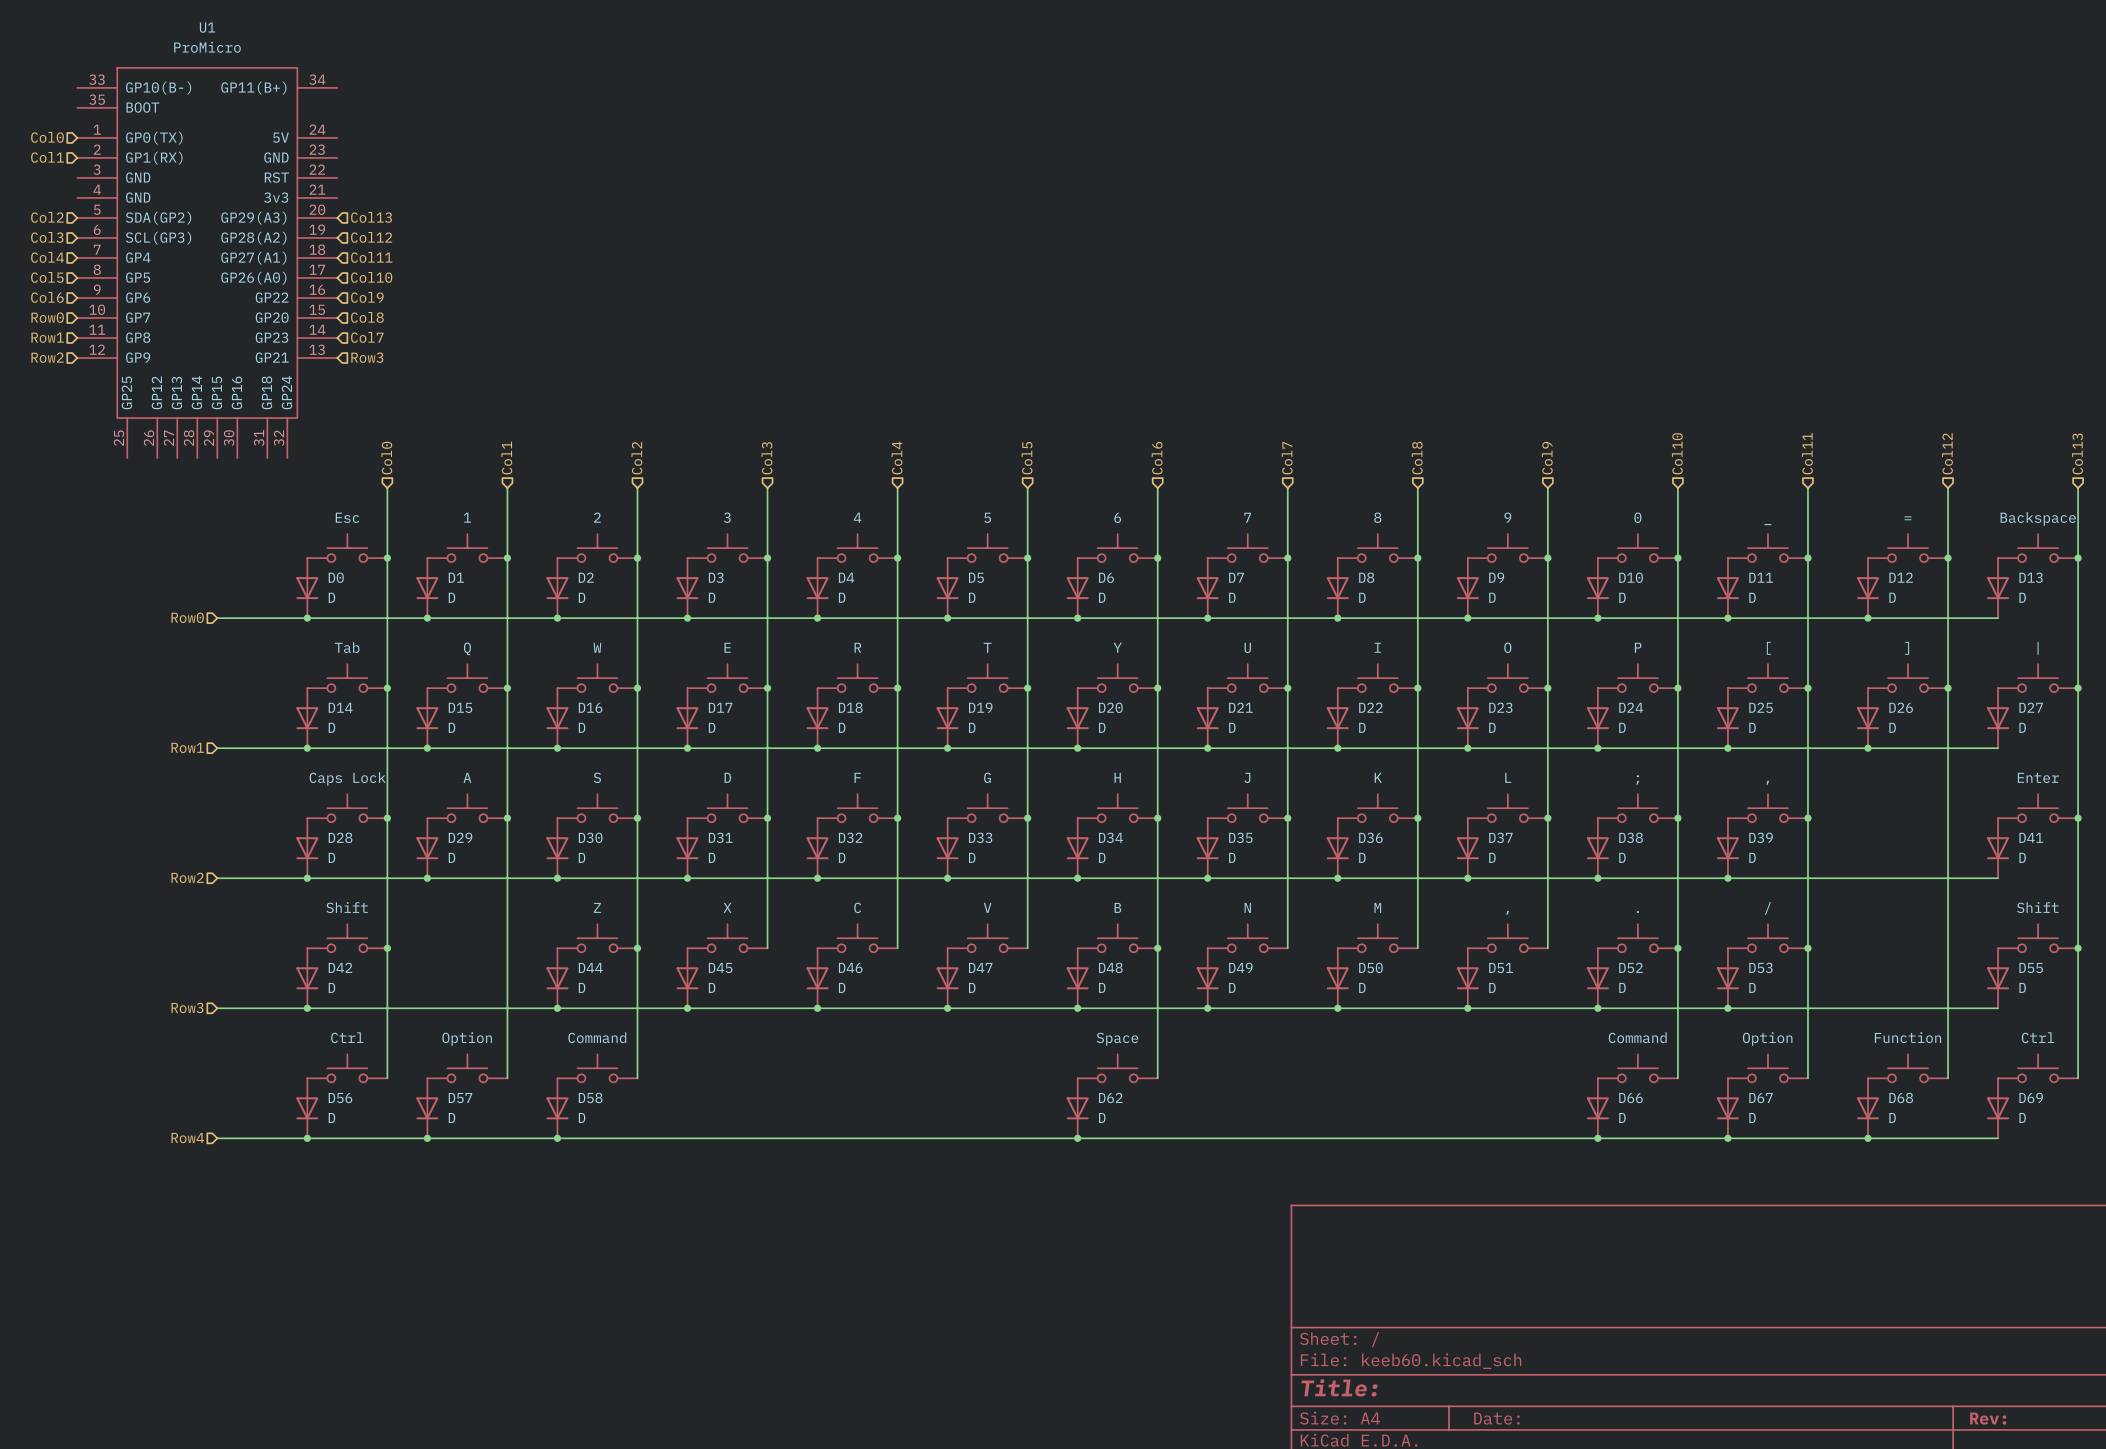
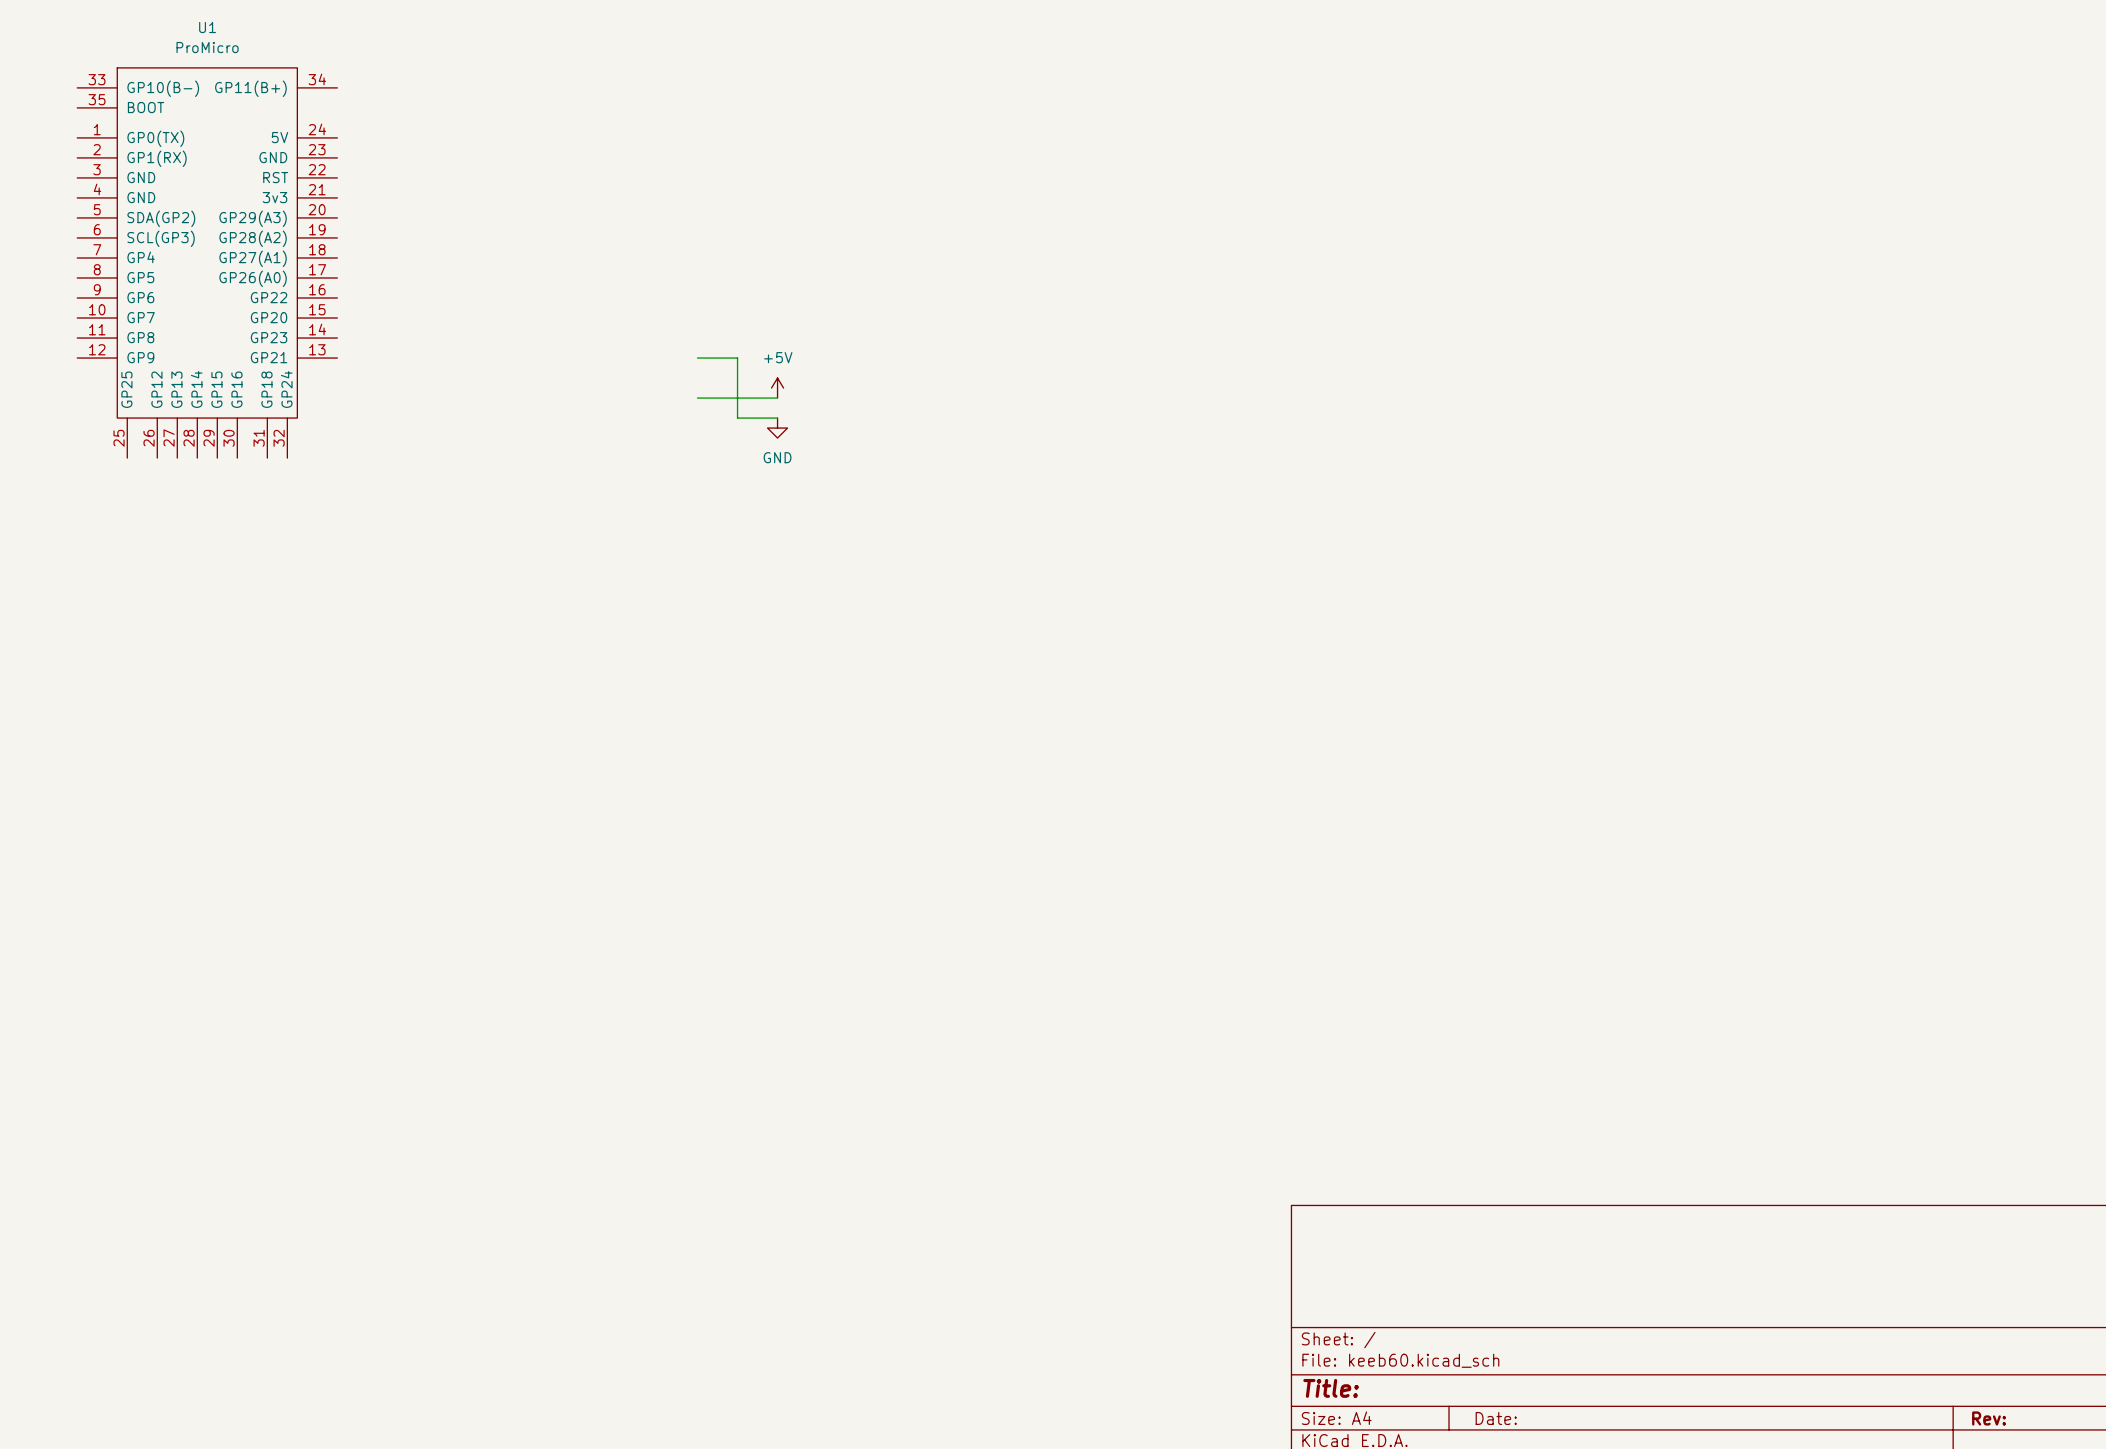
hierarchical label: Col0 (47, 137) -> none
hierarchical label: Col1 (47, 157) -> none
hierarchical label: Col2 (47, 217) -> none
hierarchical label: Col13 (371, 217) -> none
hierarchical label: Col3 (47, 237) -> none
hierarchical label: Col12 (371, 237) -> none
hierarchical label: Col4 (47, 257) -> none
hierarchical label: Col11 (371, 257) -> none
hierarchical label: Col5 (47, 277) -> none
hierarchical label: Col10 (371, 277) -> none
hierarchical label: Col6 (47, 297) -> none
hierarchical label: Col9 (367, 297) -> none
hierarchical label: Row0 (47, 317) -> none
hierarchical label: Col8 (367, 317) -> none
hierarchical label: Row1 (47, 337) -> none
hierarchical label: Col7 (367, 337) -> none
hierarchical label: Row2 (47, 357) -> none
hierarchical label: Row3 (367, 357) -> none
wire: none -> (697, 358) (737, 358) (737, 418) (777, 418)
power symbol: none -> +5V (777, 388)
wire: none -> (697, 398) (777, 398)
power symbol: none -> GND (777, 428)
hierarchical label: Col10 (1677, 453) -> none
hierarchical label: Col11 (1807, 453) -> none
hierarchical label: Col12 (1947, 453) -> none
hierarchical label: Col13 (2077, 453) -> none
hierarchical label: Col4 (897, 457) -> none
hierarchical label: Col0 (386, 458) -> none
hierarchical label: Col1 (506, 458) -> none
hierarchical label: Col2 (636, 458) -> none
hierarchical label: Col3 (766, 458) -> none
hierarchical label: Col5 (1027, 458) -> none
hierarchical label: Col6 (1157, 458) -> none
hierarchical label: Col7 (1287, 458) -> none
hierarchical label: Col8 (1417, 458) -> none
hierarchical label: Col9 (1547, 458) -> none
wire: (387, 488) (387, 1078) -> none
wire: (507, 488) (507, 1078) -> none
wire: (637, 488) (637, 1078) -> none
wire: (767, 488) (767, 948) -> none
wire: (897, 488) (897, 948) -> none
wire: (1027, 488) (1027, 948) -> none
wire: (1157, 488) (1157, 1078) -> none
wire: (1287, 488) (1287, 948) -> none
wire: (1417, 488) (1417, 948) -> none
wire: (1547, 488) (1547, 948) -> none
wire: (1677, 488) (1677, 1078) -> none
wire: (1807, 488) (1807, 1078) -> none
wire: (1948, 488) (1948, 1078) -> none
wire: (2078, 488) (2078, 1078) -> none
part: Esc (347, 548) -> none
part: 1 (467, 548) -> none
part: 2 (597, 548) -> none
part: 3 (727, 548) -> none
part: 4 (857, 548) -> none
part: 5 (987, 548) -> none
part: 6 (1117, 548) -> none
part: 7 (1247, 548) -> none
part: 8 (1377, 548) -> none
part: 9 (1507, 548) -> none
part: 0 (1637, 548) -> none
part: _ (1767, 548) -> none
part: = (1908, 548) -> none
part: Backspace (2038, 548) -> none
junction: (387, 558) -> none
junction: (507, 558) -> none
junction: (637, 558) -> none
junction: (767, 558) -> none
junction: (897, 558) -> none
junction: (1027, 558) -> none
junction: (1157, 558) -> none
junction: (1287, 558) -> none
junction: (1417, 558) -> none
junction: (1547, 558) -> none
junction: (1677, 558) -> none
junction: (1807, 558) -> none
junction: (1948, 558) -> none
junction: (2078, 558) -> none
D0: D (307, 588) -> none
D1: D (427, 588) -> none
D2: D (557, 588) -> none
D3: D (687, 588) -> none
D4: D (817, 588) -> none
D5: D (947, 588) -> none
D6: D (1077, 588) -> none
D7: D (1207, 588) -> none
D8: D (1337, 588) -> none
D9: D (1467, 588) -> none
D10: D (1597, 588) -> none
D11: D (1727, 588) -> none
D12: D (1867, 588) -> none
D13: D (1998, 588) -> none
hierarchical label: Row0 (187, 617) -> none
wire: (217, 618) (1998, 618) -> none
junction: (307, 618) -> none
junction: (427, 618) -> none
junction: (557, 618) -> none
junction: (687, 618) -> none
junction: (817, 618) -> none
junction: (947, 618) -> none
junction: (1077, 618) -> none
junction: (1207, 618) -> none
junction: (1337, 618) -> none
junction: (1467, 618) -> none
junction: (1597, 618) -> none
junction: (1727, 618) -> none
junction: (1867, 618) -> none
part: Tab (347, 678) -> none
part: Q (467, 678) -> none
part: W (597, 678) -> none
part: E (727, 678) -> none
part: R (857, 678) -> none
part: T (987, 678) -> none
part: Y (1117, 678) -> none
part: U (1247, 678) -> none
part: I (1377, 678) -> none
part: O (1507, 678) -> none
part: P (1637, 678) -> none
part: [ (1767, 678) -> none
part: ] (1908, 678) -> none
part: | (2038, 678) -> none
junction: (387, 688) -> none
junction: (507, 688) -> none
junction: (637, 688) -> none
junction: (767, 688) -> none
junction: (897, 688) -> none
junction: (1027, 688) -> none
junction: (1157, 688) -> none
junction: (1287, 688) -> none
junction: (1417, 688) -> none
junction: (1547, 688) -> none
junction: (1677, 688) -> none
junction: (1807, 688) -> none
junction: (1948, 688) -> none
junction: (2078, 688) -> none
D14: D (307, 718) -> none
D15: D (427, 718) -> none
D16: D (557, 718) -> none
D17: D (687, 718) -> none
D18: D (817, 718) -> none
D19: D (947, 718) -> none
D20: D (1077, 718) -> none
D21: D (1207, 718) -> none
D22: D (1337, 718) -> none
D23: D (1467, 718) -> none
D24: D (1597, 718) -> none
D25: D (1727, 718) -> none
D26: D (1867, 718) -> none
D27: D (1998, 718) -> none
hierarchical label: Row1 (187, 747) -> none
wire: (217, 748) (1998, 748) -> none
junction: (307, 748) -> none
junction: (427, 748) -> none
junction: (557, 748) -> none
junction: (687, 748) -> none
junction: (817, 748) -> none
junction: (947, 748) -> none
junction: (1077, 748) -> none
junction: (1207, 748) -> none
junction: (1337, 748) -> none
junction: (1467, 748) -> none
junction: (1597, 748) -> none
junction: (1727, 748) -> none
junction: (1867, 748) -> none
part: Caps Lock (347, 808) -> none
part: A (467, 808) -> none
part: S (597, 808) -> none
part: D (727, 808) -> none
part: F (857, 808) -> none
part: G (987, 808) -> none
part: H (1117, 808) -> none
part: J (1247, 808) -> none
part: K (1377, 808) -> none
part: L (1507, 808) -> none
part: ; (1637, 808) -> none
part: , (1767, 808) -> none
part: Enter (2038, 808) -> none
junction: (387, 818) -> none
junction: (507, 818) -> none
junction: (637, 818) -> none
junction: (767, 818) -> none
junction: (897, 818) -> none
junction: (1027, 818) -> none
junction: (1157, 818) -> none
junction: (1287, 818) -> none
junction: (1417, 818) -> none
junction: (1547, 818) -> none
junction: (1677, 818) -> none
junction: (1807, 818) -> none
junction: (2078, 818) -> none
D28: D (307, 848) -> none
D29: D (427, 848) -> none
D30: D (557, 848) -> none
D31: D (687, 848) -> none
D32: D (817, 848) -> none
D33: D (947, 848) -> none
D34: D (1077, 848) -> none
D35: D (1207, 848) -> none
D36: D (1337, 848) -> none
D37: D (1467, 848) -> none
D38: D (1597, 848) -> none
D39: D (1727, 848) -> none
D41: D (1998, 848) -> none
hierarchical label: Row2 (187, 877) -> none
wire: (217, 878) (1998, 878) -> none
junction: (307, 878) -> none
junction: (427, 878) -> none
junction: (557, 878) -> none
junction: (687, 878) -> none
junction: (817, 878) -> none
junction: (947, 878) -> none
junction: (1077, 878) -> none
junction: (1207, 878) -> none
junction: (1337, 878) -> none
junction: (1467, 878) -> none
junction: (1597, 878) -> none
junction: (1727, 878) -> none
part: Shift (347, 938) -> none
part: Z (597, 938) -> none
part: X (727, 938) -> none
part: C (857, 938) -> none
part: V (987, 938) -> none
part: B (1117, 938) -> none
part: N (1247, 938) -> none
part: M (1377, 938) -> none
part: , (1507, 938) -> none
part: . (1637, 938) -> none
part: / (1767, 938) -> none
part: Shift (2038, 938) -> none
junction: (387, 948) -> none
junction: (637, 948) -> none
junction: (1157, 948) -> none
junction: (1677, 948) -> none
junction: (1807, 948) -> none
junction: (2078, 948) -> none
D42: D (307, 978) -> none
D44: D (557, 978) -> none
D45: D (687, 978) -> none
D46: D (817, 978) -> none
D47: D (947, 978) -> none
D48: D (1077, 978) -> none
D49: D (1207, 978) -> none
D50: D (1337, 978) -> none
D51: D (1467, 978) -> none
D52: D (1597, 978) -> none
D53: D (1727, 978) -> none
D55: D (1998, 978) -> none
hierarchical label: Row3 (187, 1007) -> none
wire: (217, 1008) (1998, 1008) -> none
junction: (307, 1008) -> none
junction: (557, 1008) -> none
junction: (687, 1008) -> none
junction: (817, 1008) -> none
junction: (947, 1008) -> none
junction: (1077, 1008) -> none
junction: (1207, 1008) -> none
junction: (1337, 1008) -> none
junction: (1467, 1008) -> none
junction: (1597, 1008) -> none
junction: (1727, 1008) -> none
part: Ctrl (347, 1068) -> none
part: Option (467, 1068) -> none
part: Command (597, 1068) -> none
part: Space (1117, 1068) -> none
part: Command (1637, 1068) -> none
part: Option (1767, 1068) -> none
part: Function (1908, 1068) -> none
part: Ctrl (2038, 1068) -> none
D56: D (307, 1108) -> none
D57: D (427, 1108) -> none
D58: D (557, 1108) -> none
D62: D (1077, 1108) -> none
D66: D (1597, 1108) -> none
D67: D (1727, 1108) -> none
D68: D (1867, 1108) -> none
D69: D (1998, 1108) -> none
hierarchical label: Row4 (187, 1138) -> none
wire: (217, 1138) (1998, 1138) -> none
junction: (307, 1138) -> none
junction: (427, 1138) -> none
junction: (557, 1138) -> none
junction: (1077, 1138) -> none
junction: (1597, 1138) -> none
junction: (1727, 1138) -> none
junction: (1867, 1138) -> none

